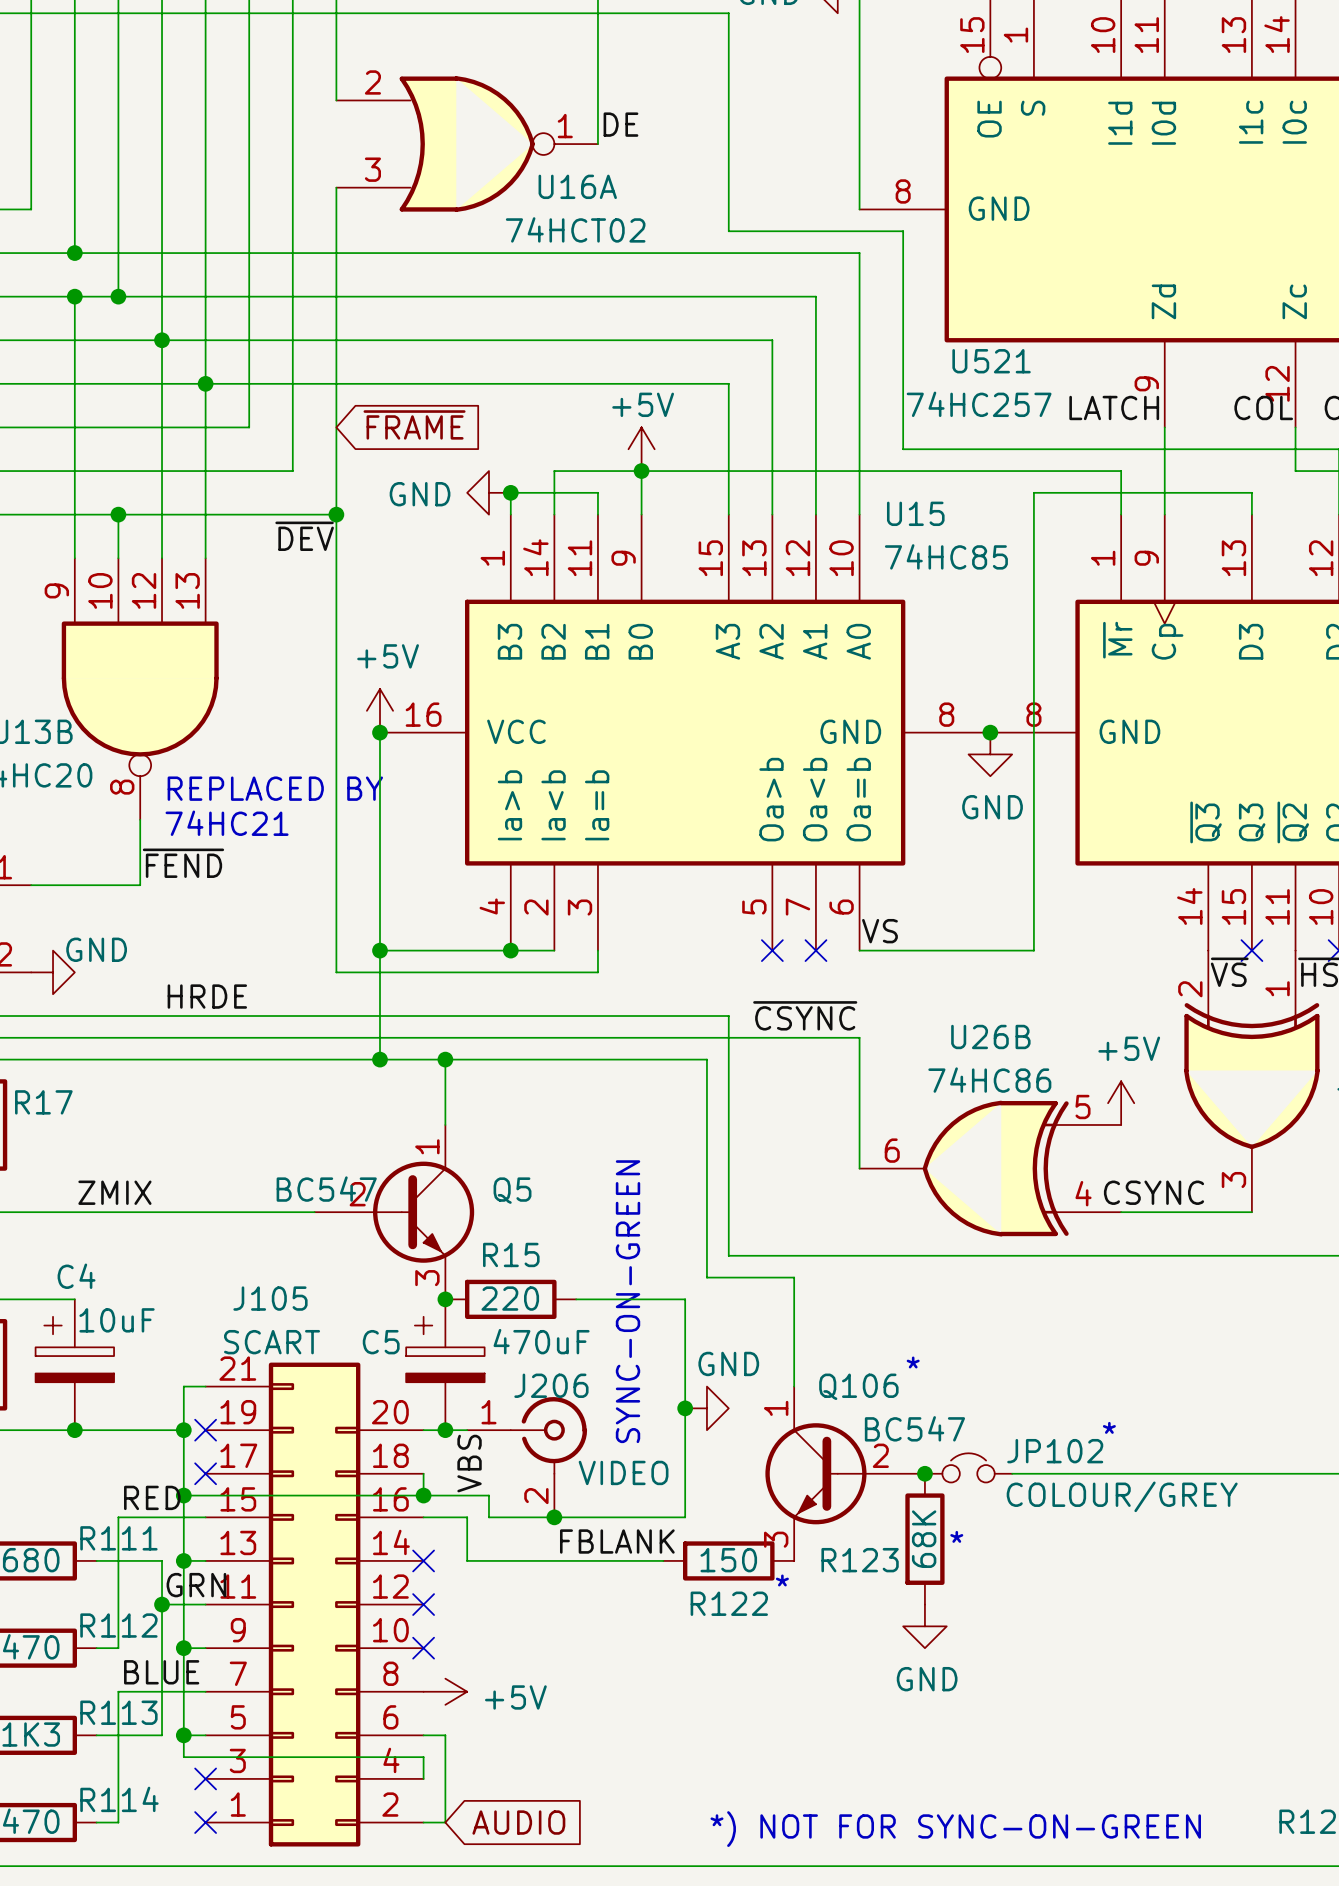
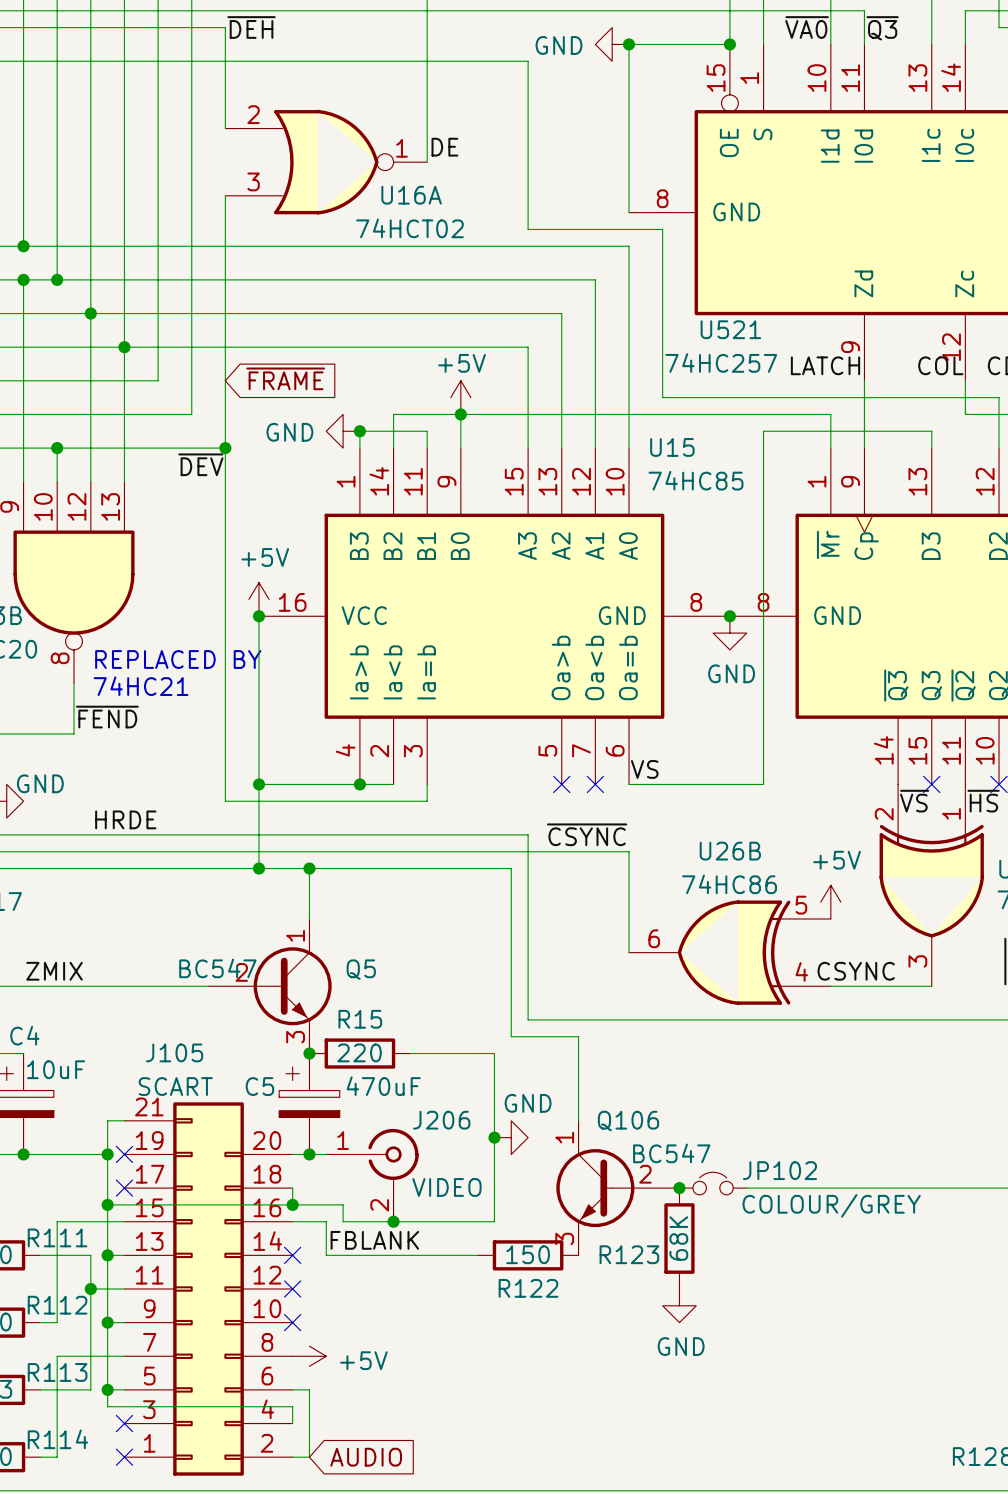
text: SYNC-ON-GREEN (628, 1301) -> none
text: * (913, 1362) -> none
J206 name position: J206 (551, 1385) -> J206 (441, 1120)
text: * (1109, 1427) -> none
label: VBS (469, 1463) -> none
label: RED (152, 1497) -> none
text: * (956, 1536) -> none
label position: FBLANK (617, 1541) -> FBLANK (374, 1240)
text: * (782, 1580) -> none
label: GRN (196, 1585) -> none
label: BLUE (161, 1672) -> none
text: *) NOT FOR SYNC-ON-GREEN (955, 1829) -> none

